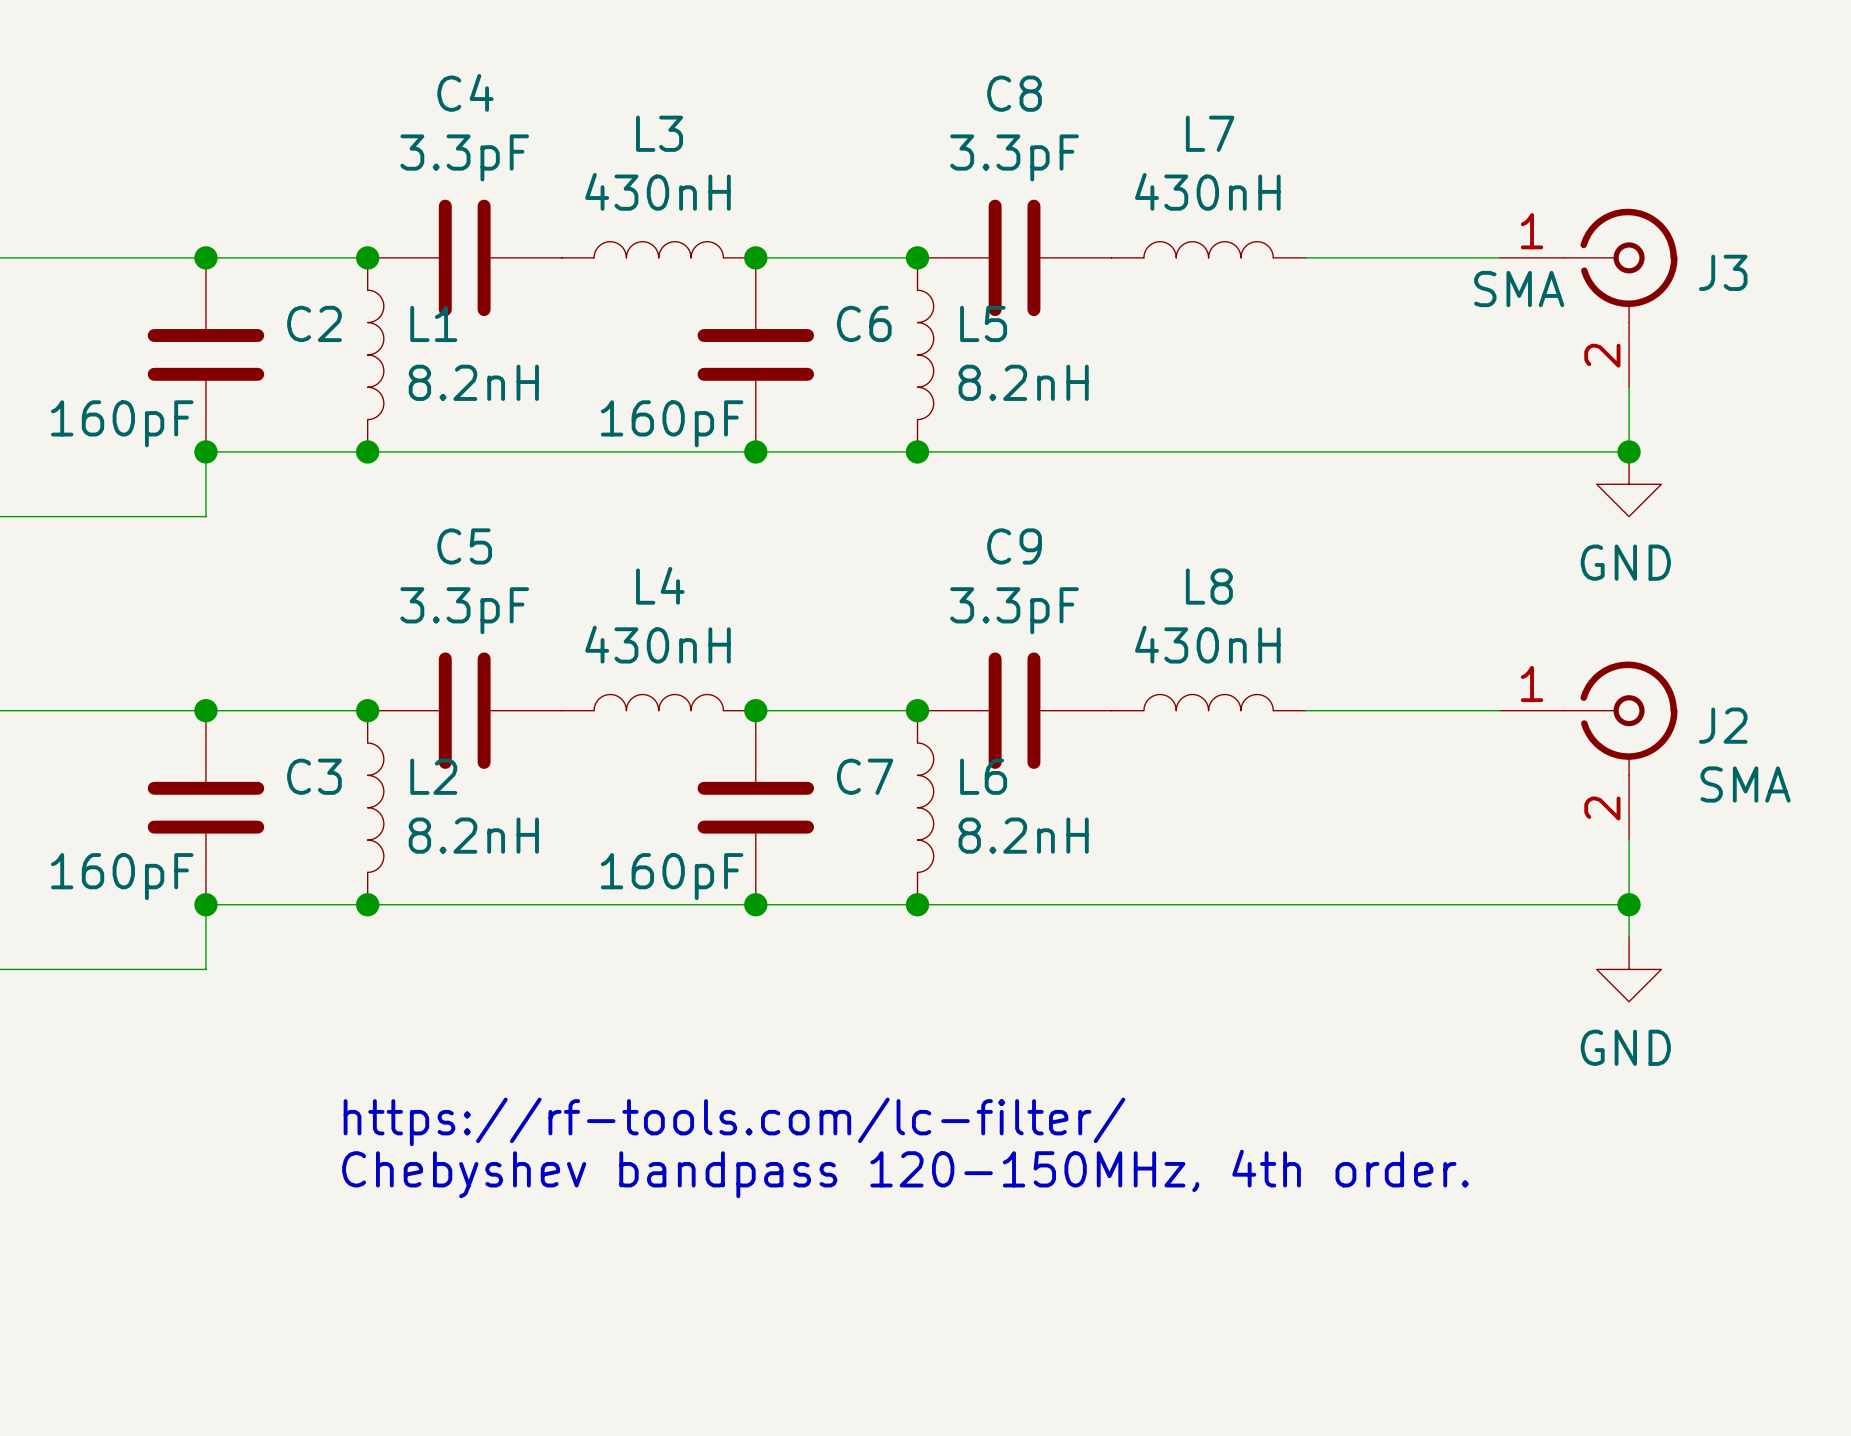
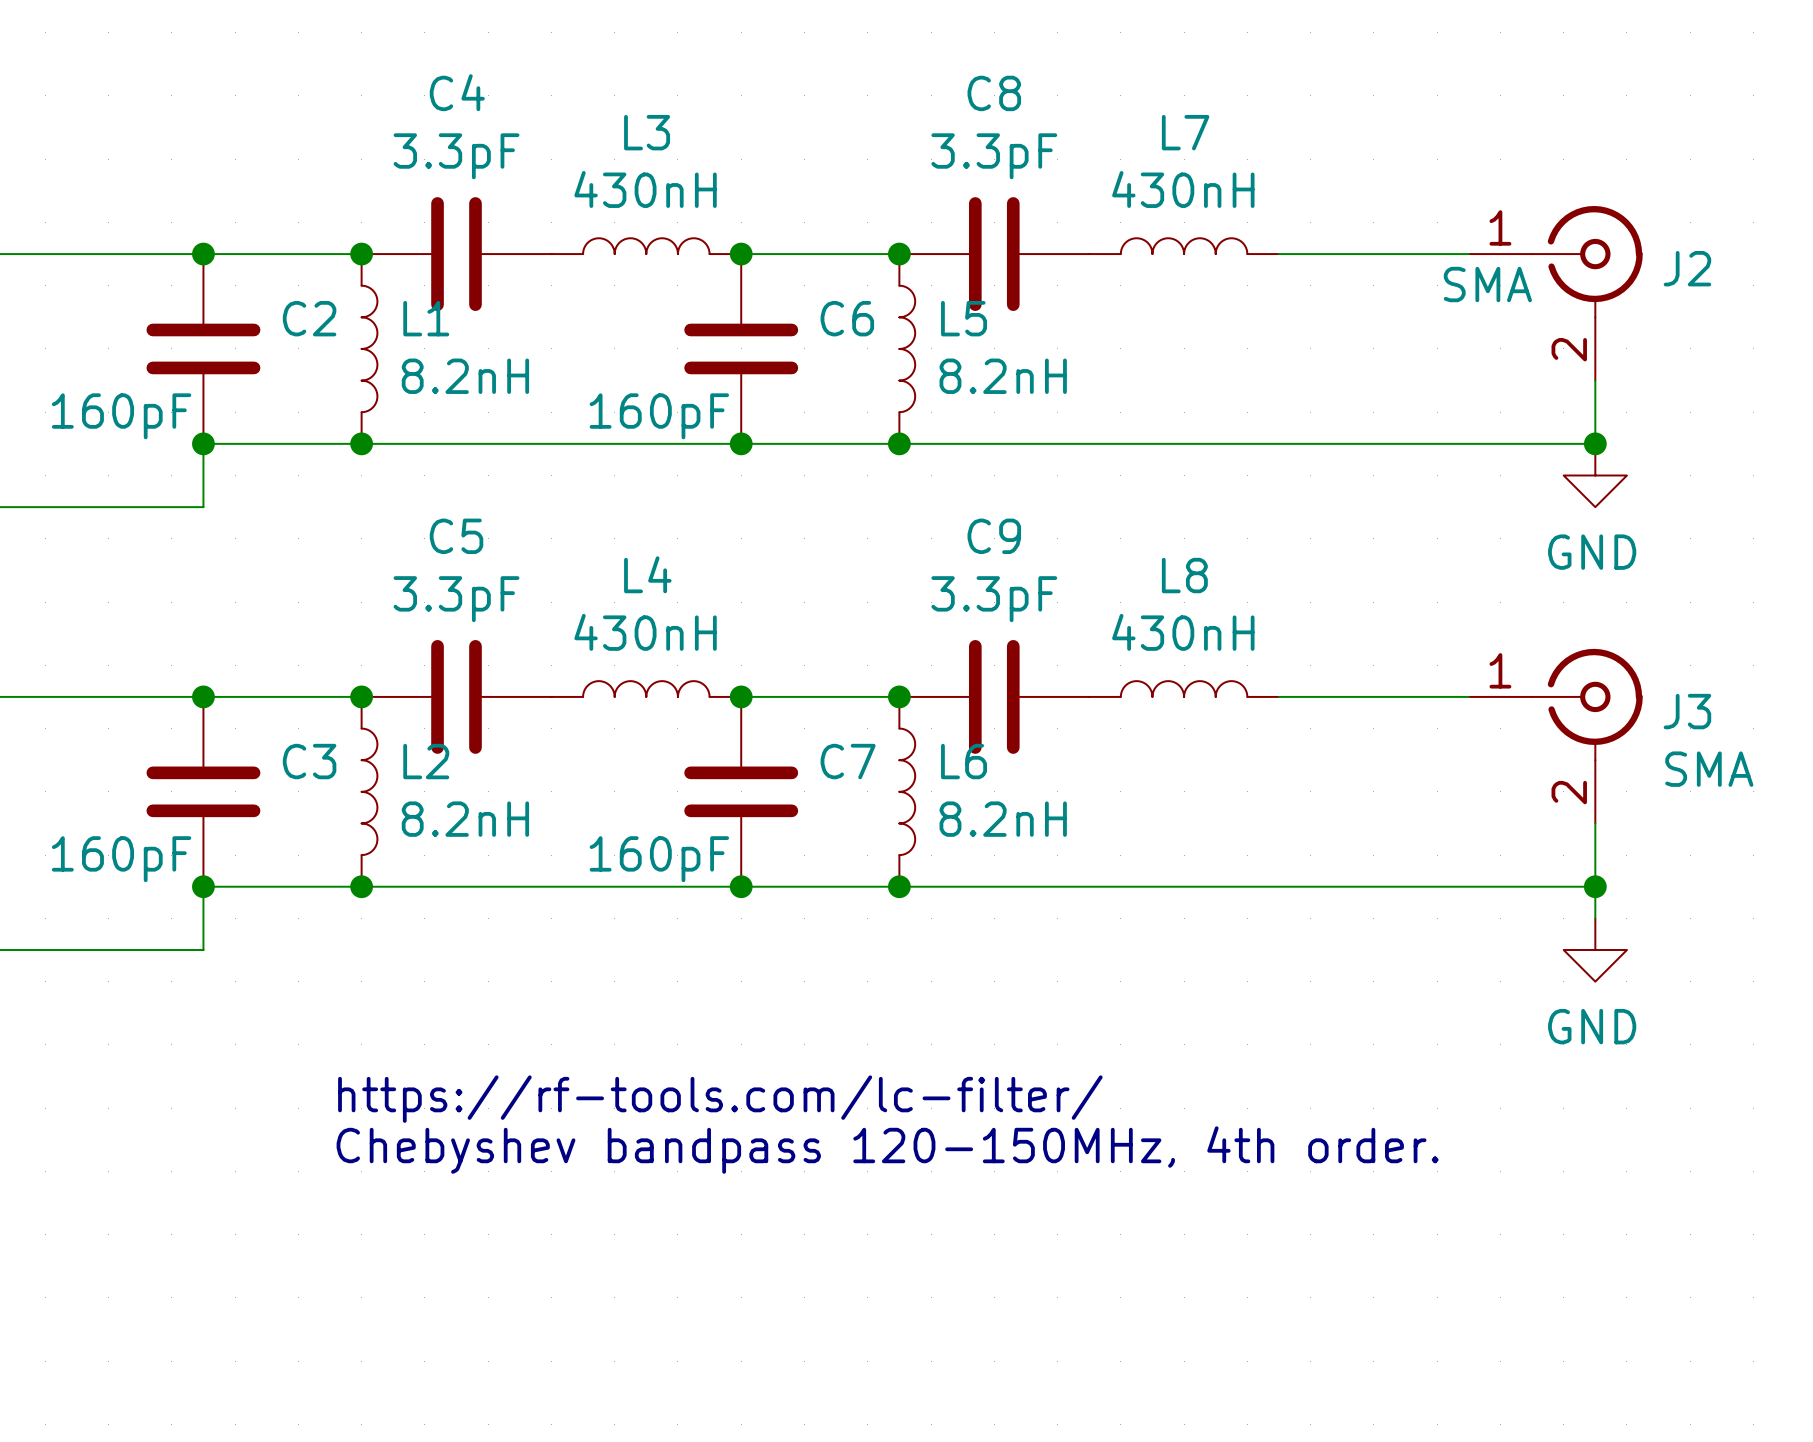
J3 name: J3 (1723, 272) -> J2 (1687, 268)
J2 name: J2 (1723, 725) -> J3 (1687, 711)

